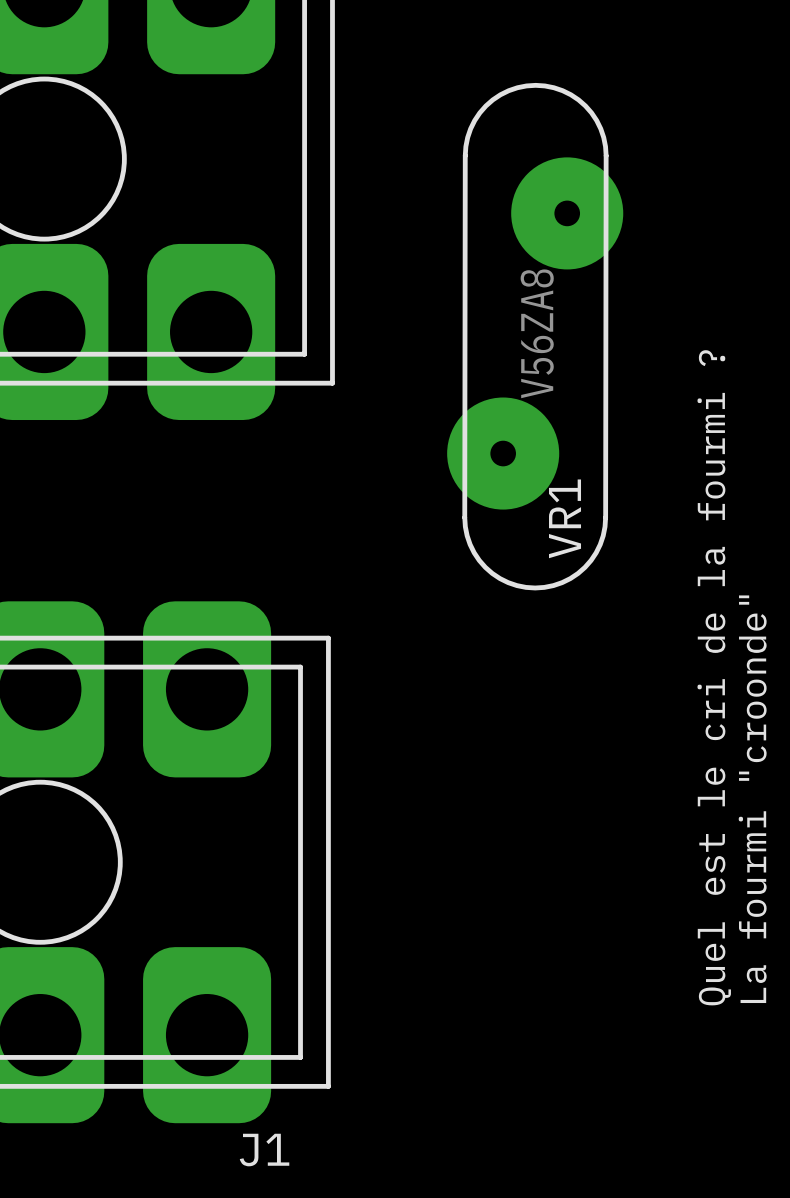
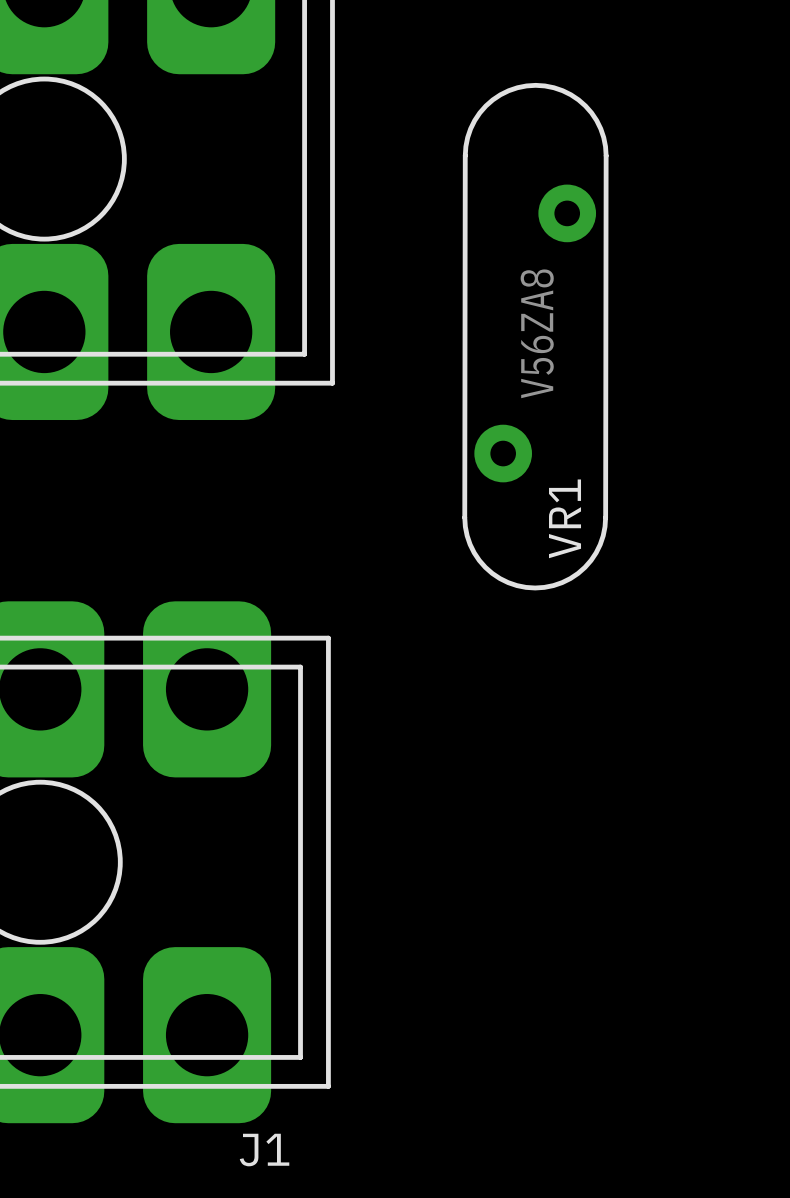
VR1 footprint: [447, 82, 624, 591] -> [462, 82, 609, 591]
text: Quel est le cri de la fourmi ? (714, 677) -> none
text: La fourmi "croonde" (752, 799) -> none

